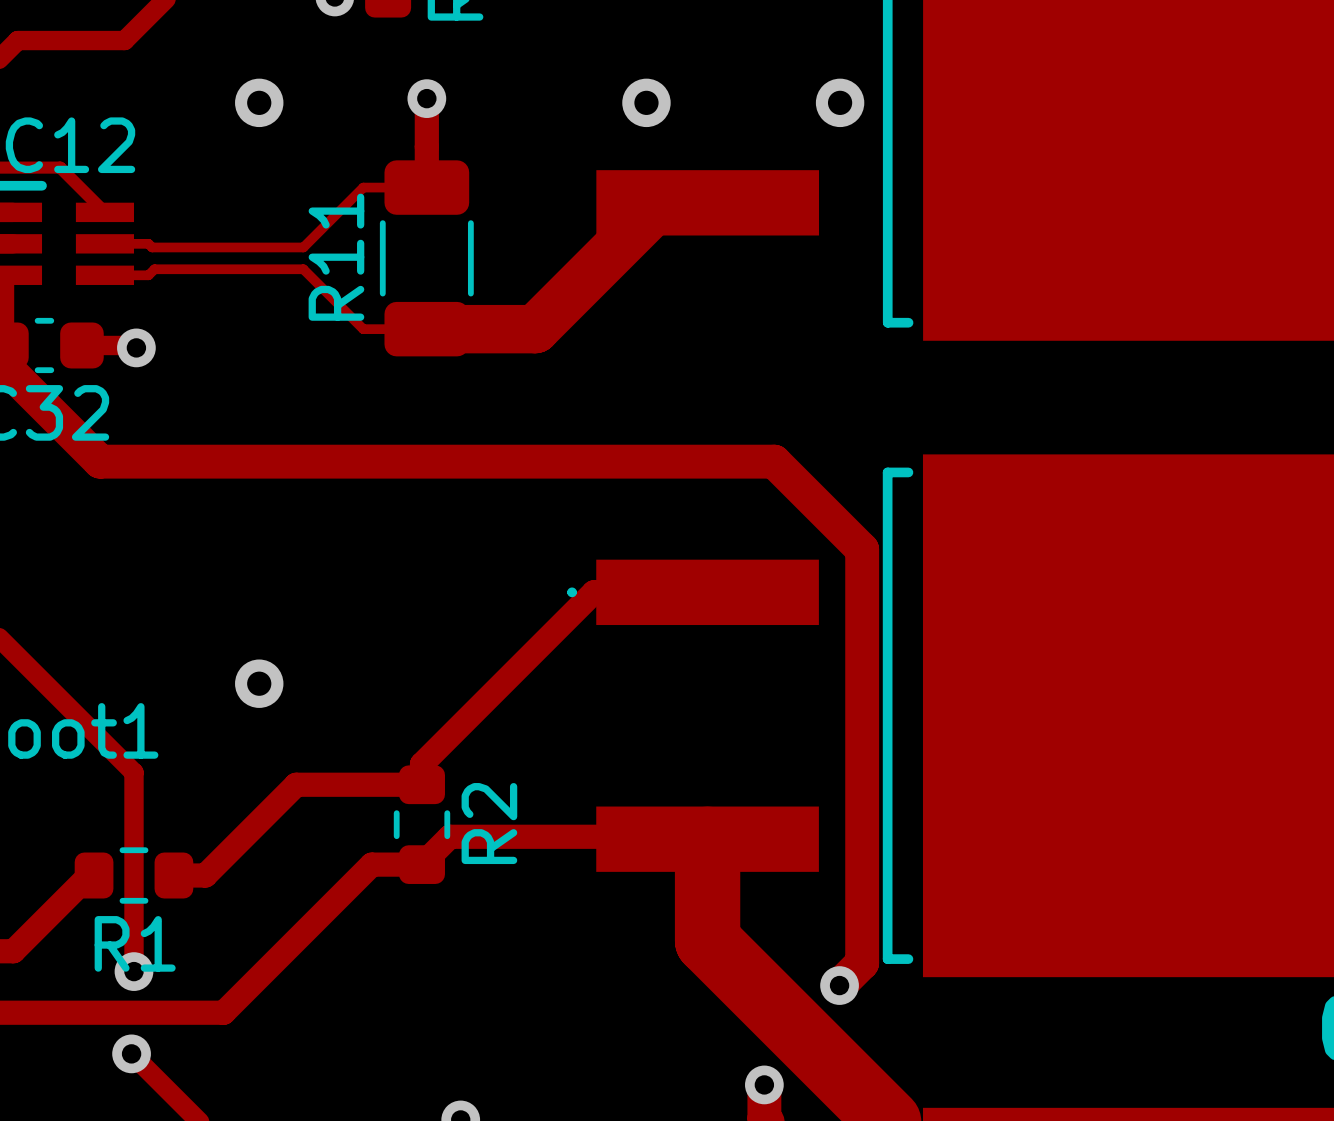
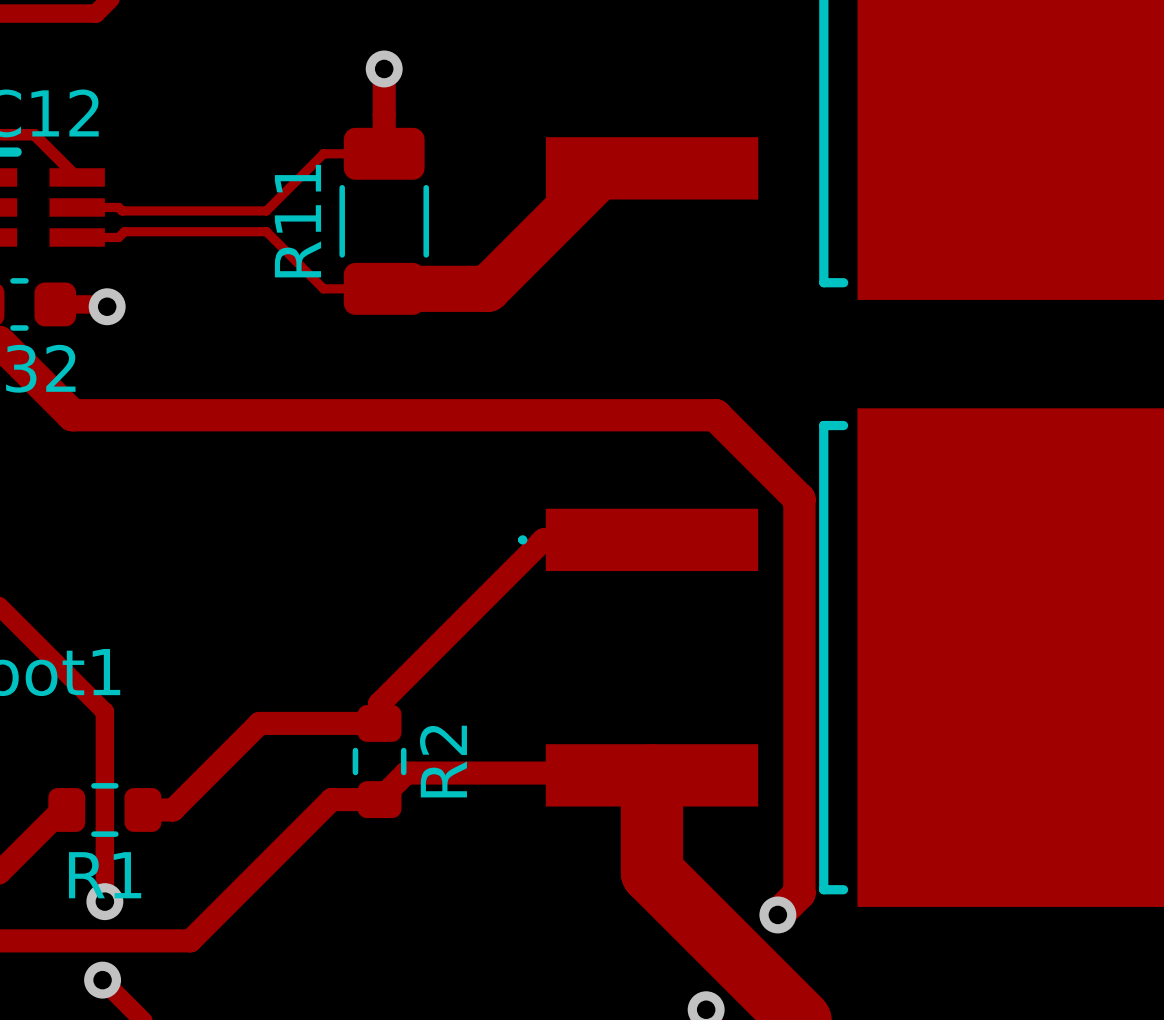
via: (259, 102) -> none
via: (646, 102) -> none
via: (840, 102) -> none
via: (259, 683) -> none

